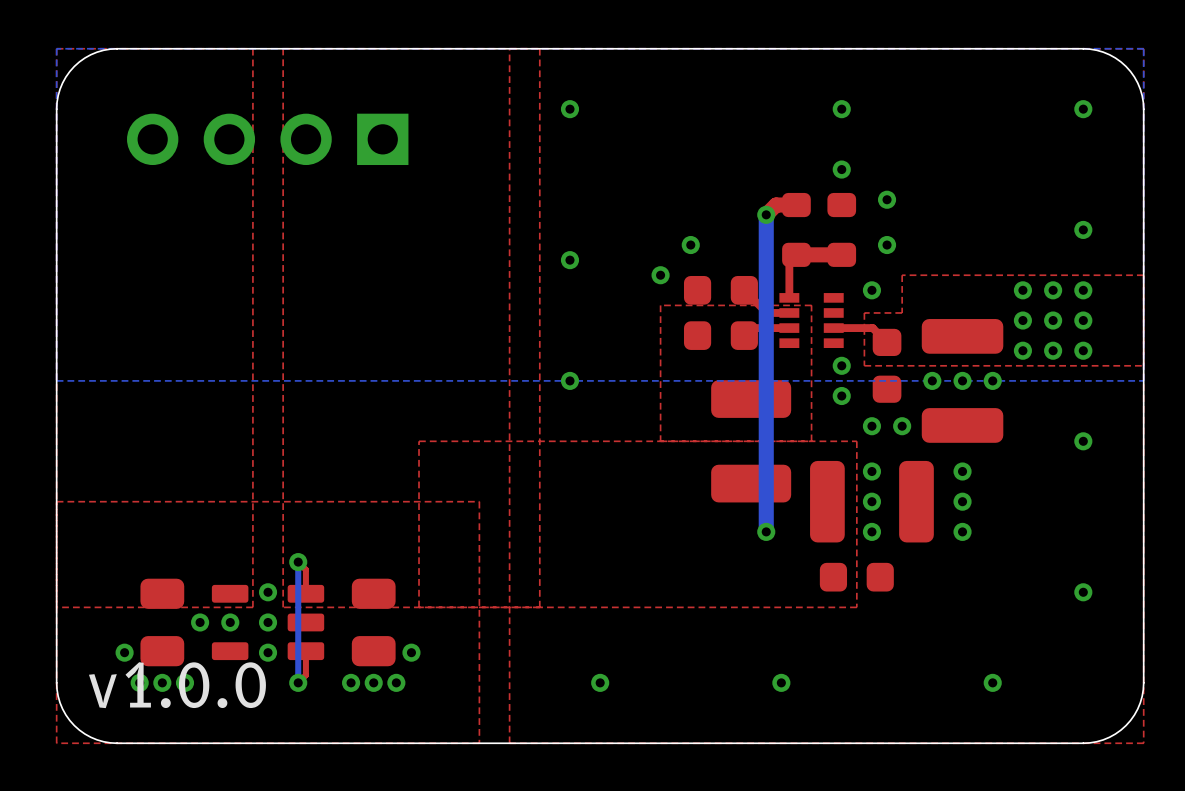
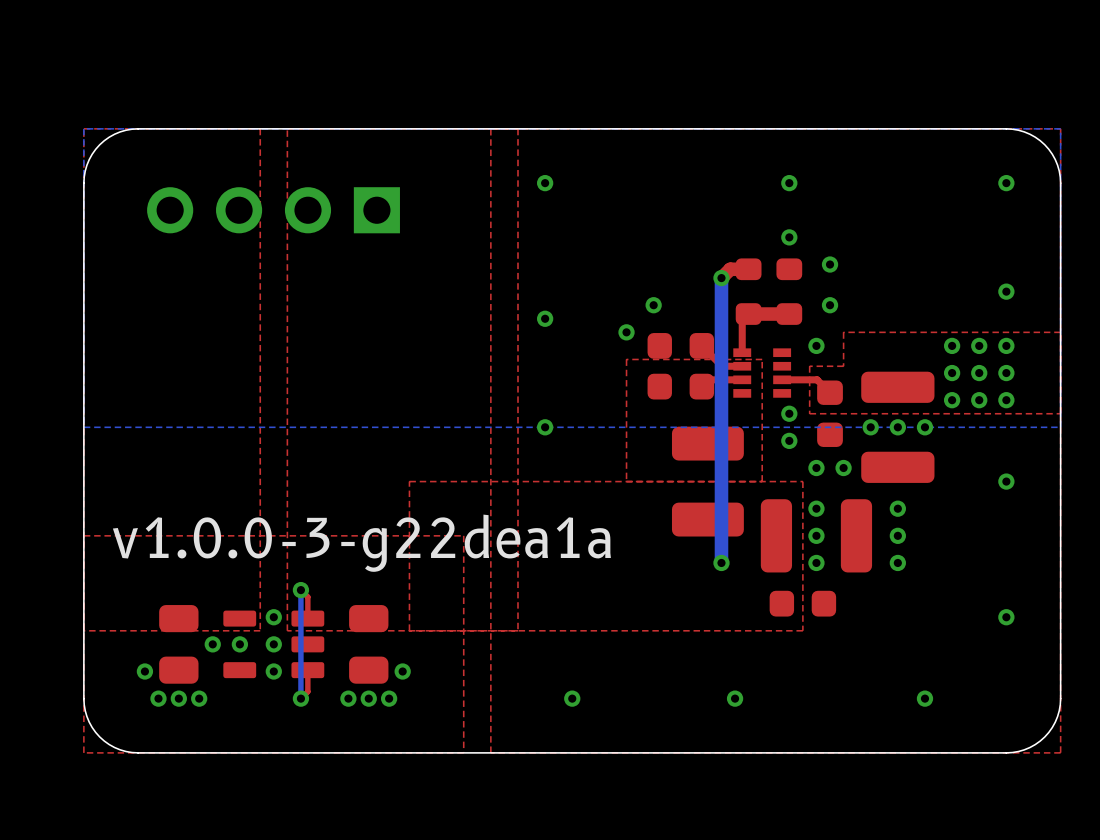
text: none -> v1.0.0-3-g22dea1a (361, 543)
text: v1.0.0 (177, 685) -> none

